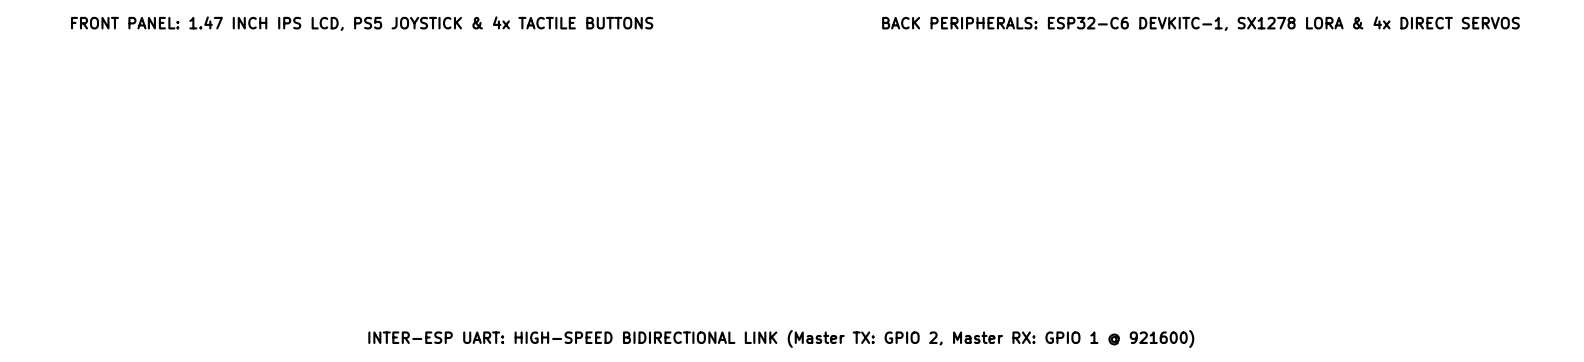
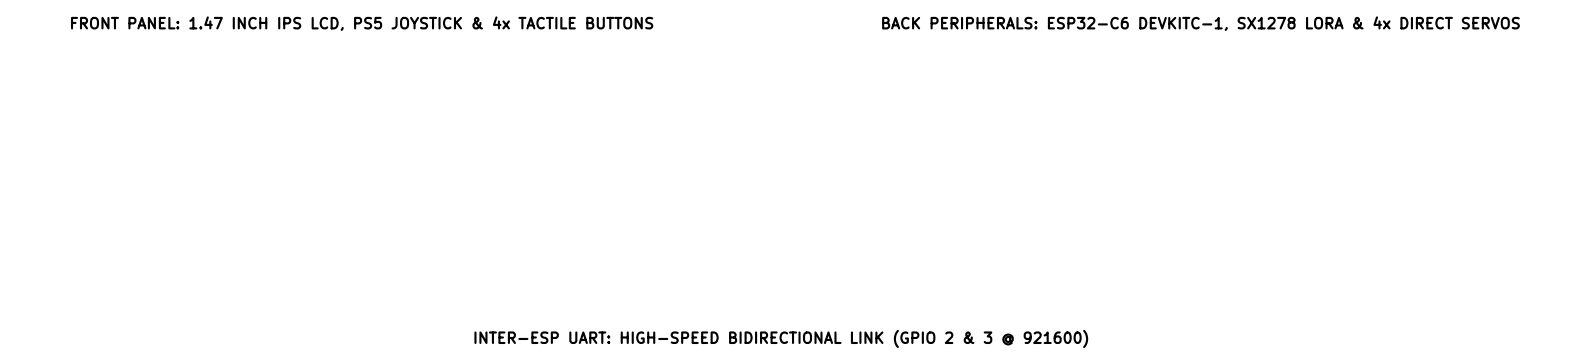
text: INTER-ESP UART: HIGH-SPEED BIDIRECTIONAL LINK (Master TX: GPIO 2, Master RX: GPIO 1 @ 921600) (781, 338) -> INTER-ESP UART: HIGH-SPEED BIDIRECTIONAL LINK (GPIO 2 & 3 @ 921600) (781, 338)

